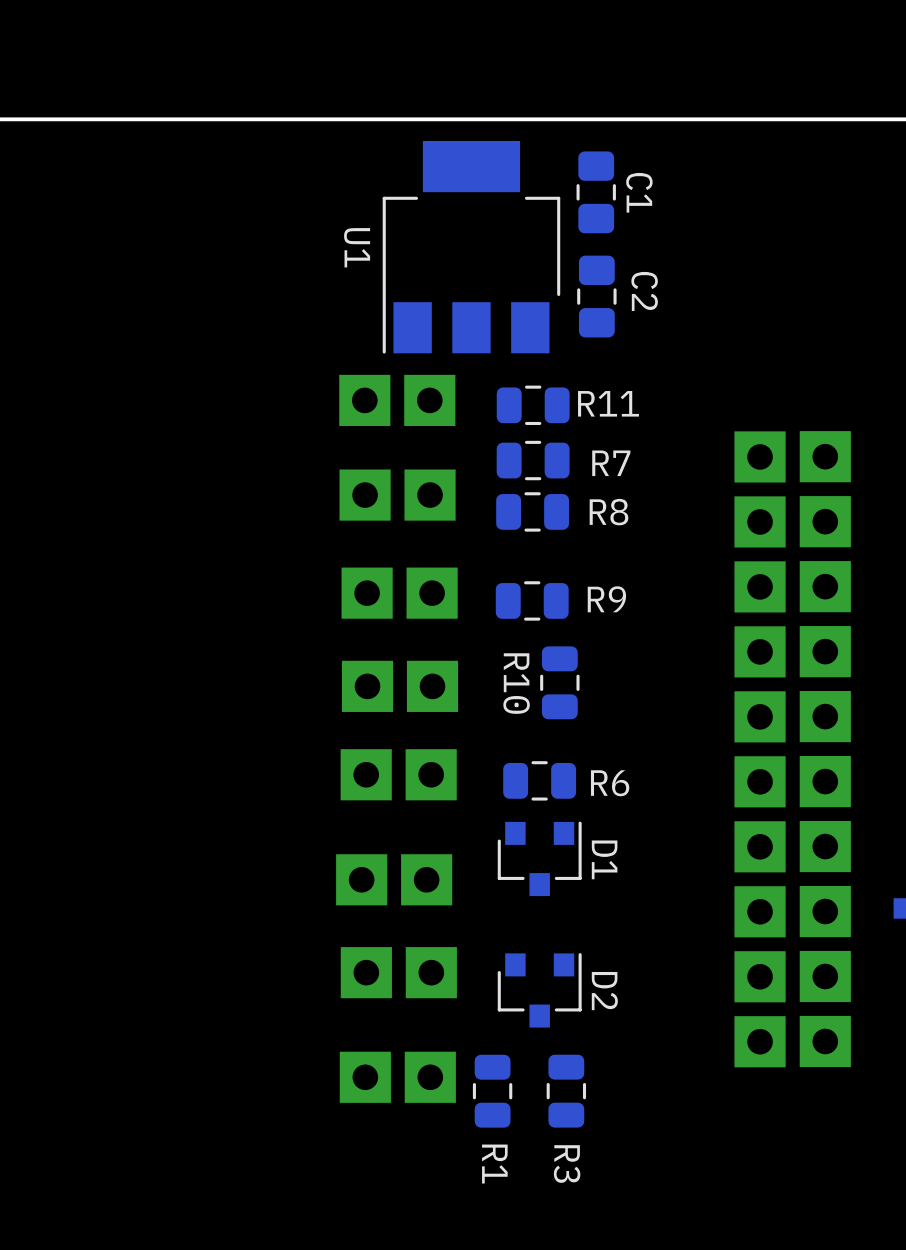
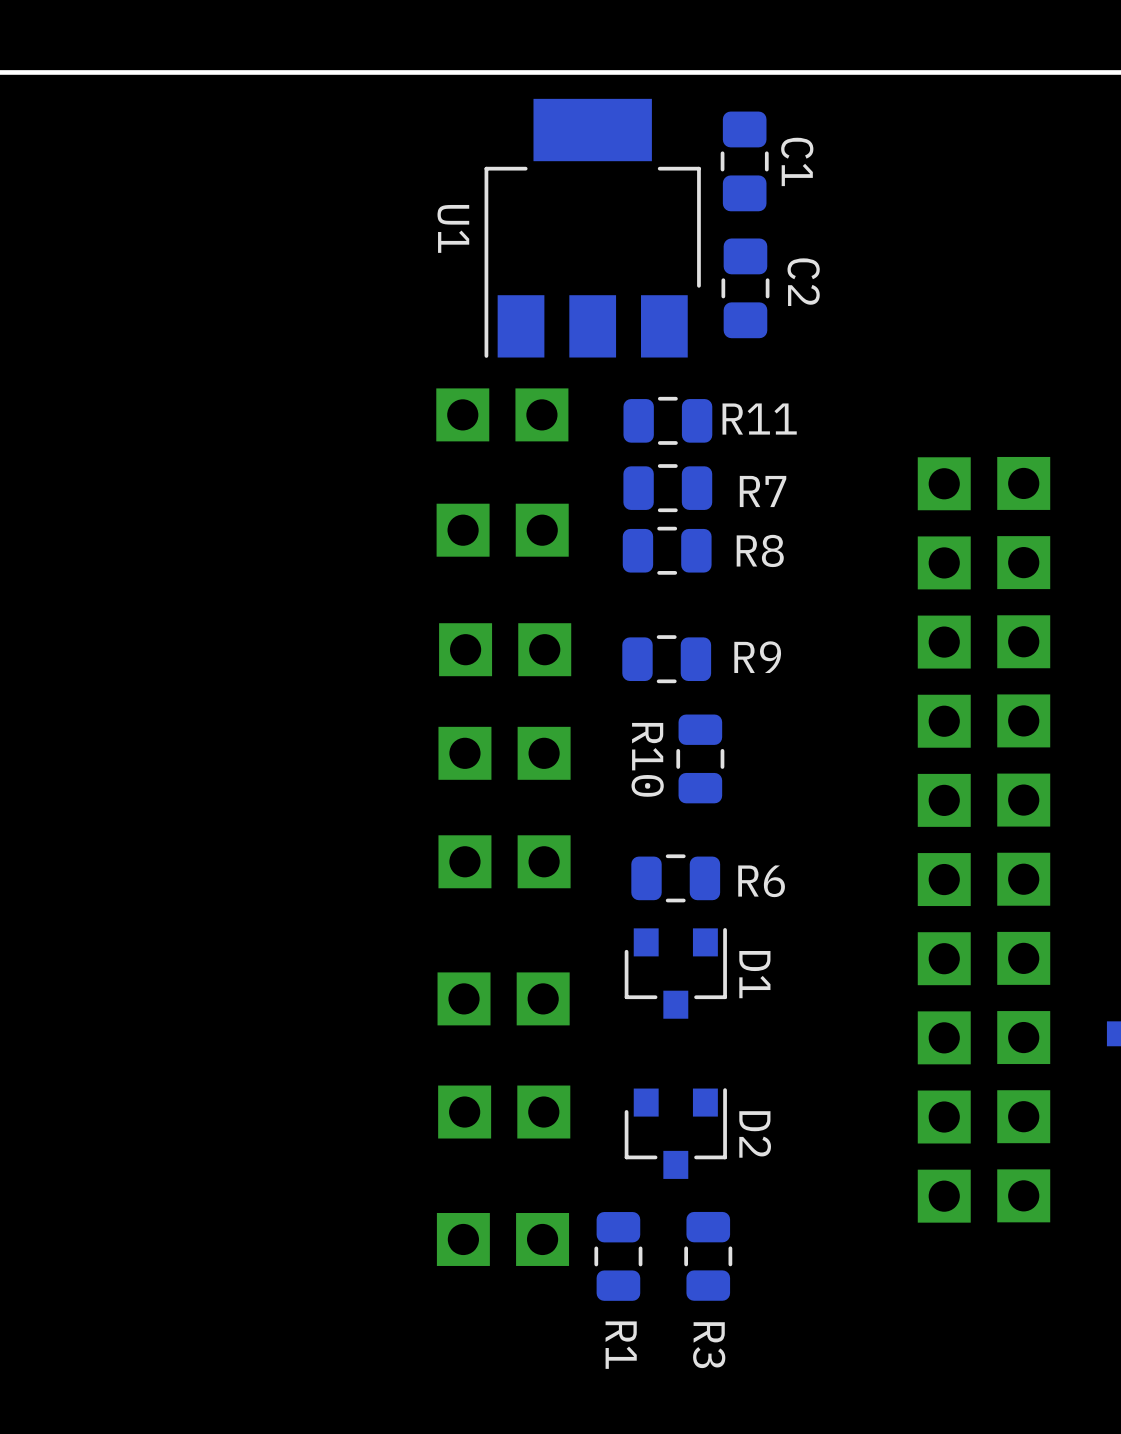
part footprint: [339, 374, 456, 426] -> [436, 388, 569, 442]
part footprint: [734, 431, 786, 1068] -> [917, 457, 971, 1223]
part footprint: [799, 431, 851, 1068] -> [997, 456, 1051, 1223]
part footprint: [339, 469, 456, 521] -> [436, 503, 569, 557]
part footprint: [341, 567, 458, 619] -> [439, 623, 572, 677]
part footprint: [341, 660, 459, 712] -> [438, 726, 571, 780]
part footprint: [340, 749, 457, 801] -> [438, 835, 571, 889]
part footprint: [336, 854, 453, 906] -> [437, 972, 570, 1026]
part footprint: [340, 947, 457, 999] -> [438, 1085, 571, 1139]
part footprint: [339, 1051, 456, 1103] -> [436, 1212, 570, 1266]

